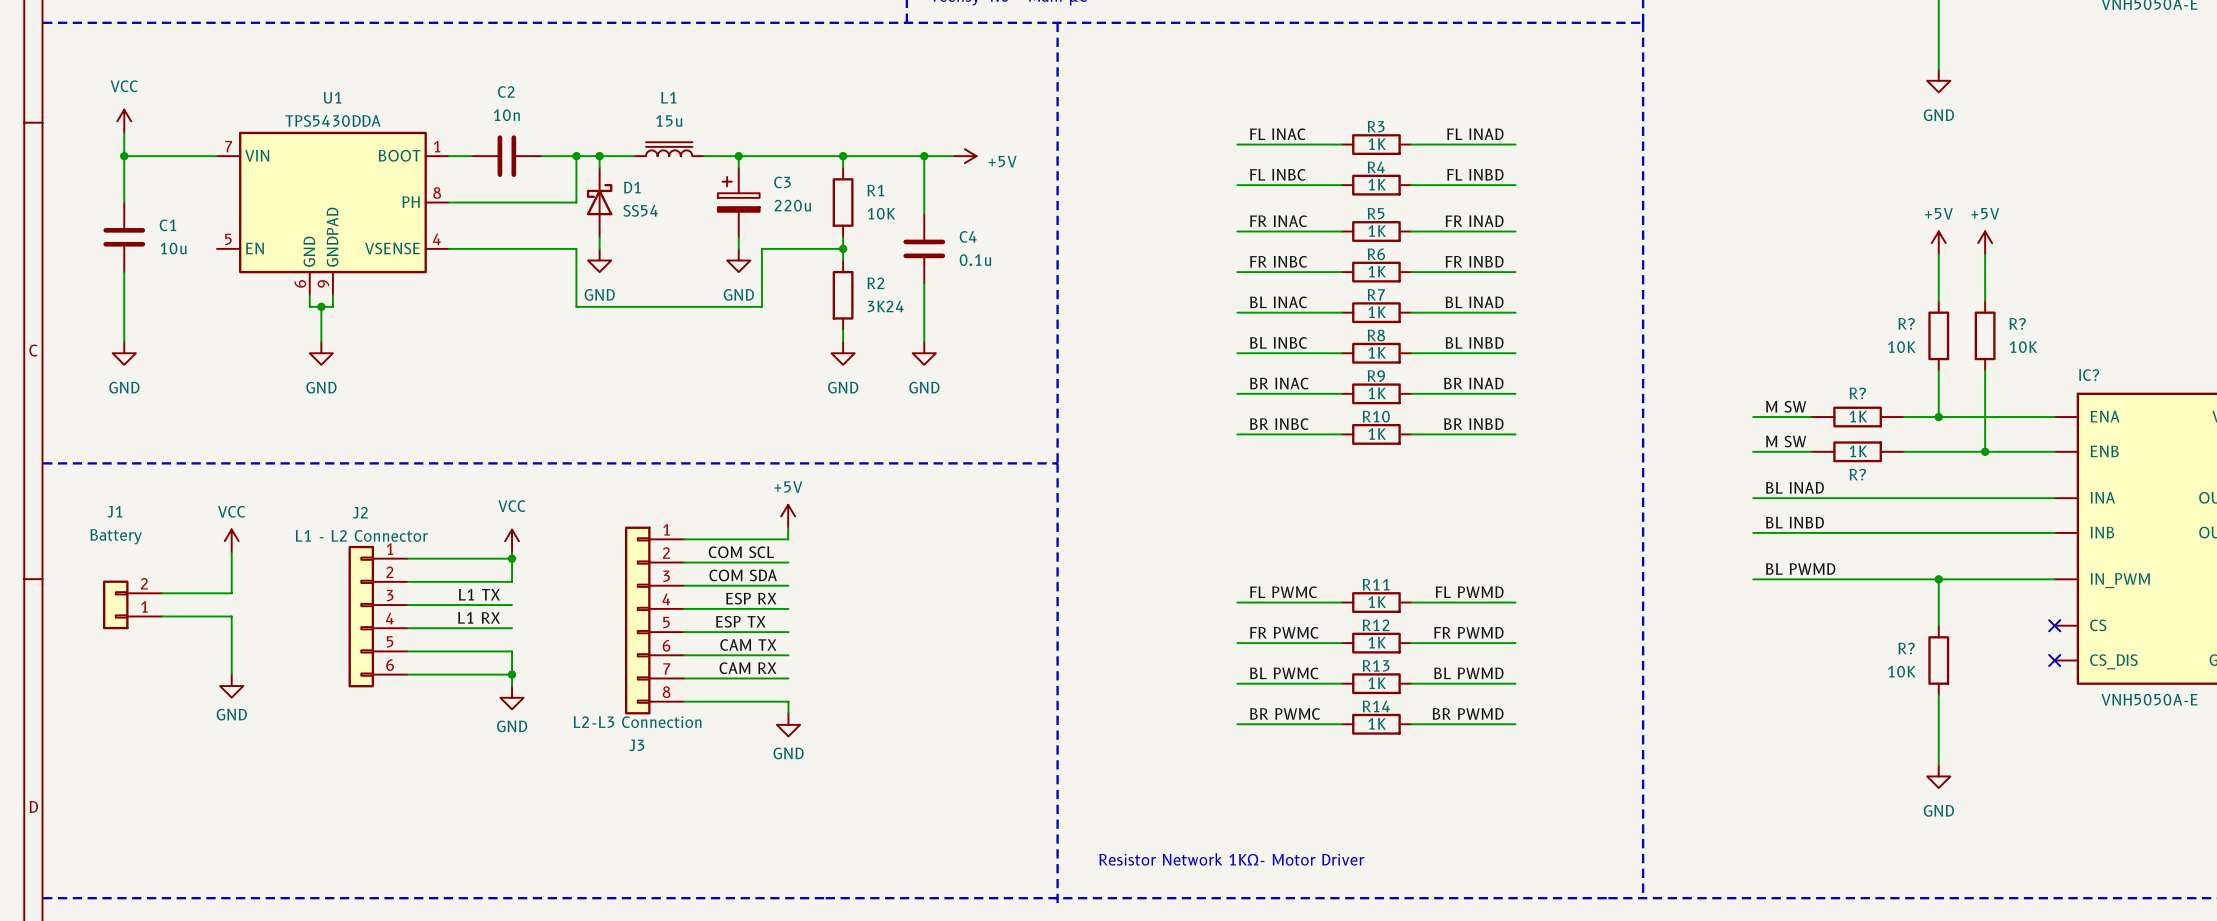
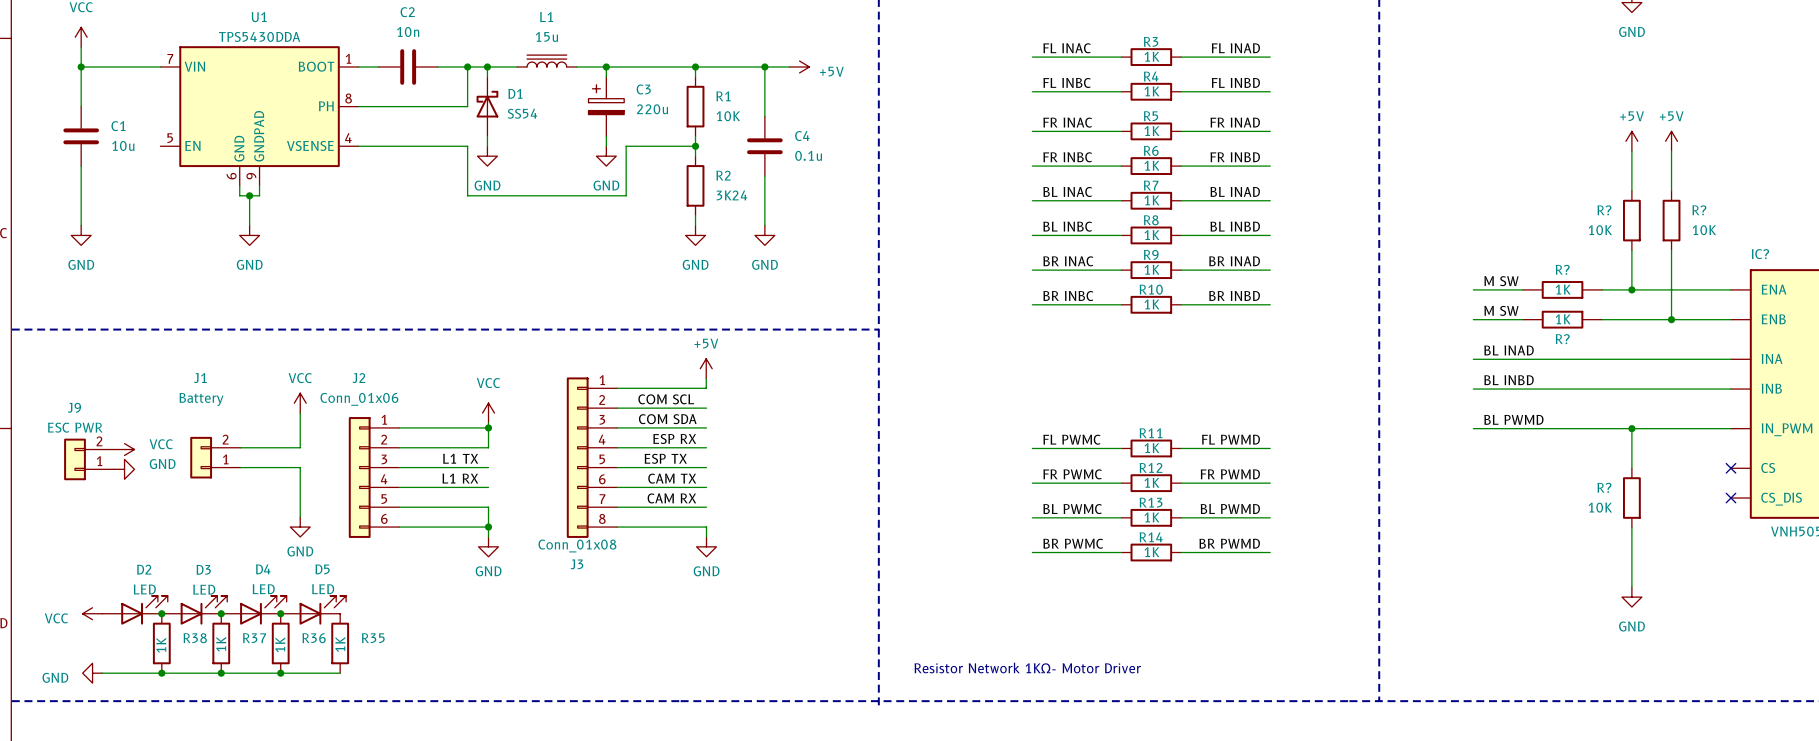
J2 name position: J2 (360, 512) -> J2 (358, 378)
power symbol position: +5V (788, 516) -> +5V (706, 368)
wire: (788, 528) (788, 539) (684, 539) -> (706, 378) (706, 388) (617, 388)
J2 value: L1 - L2 Connector (361, 535) -> Conn_01x06 (359, 399)
power symbol: VCC (231, 541) -> none
power symbol: VCC (512, 541) -> none
power symbol: none -> VCC (300, 403)
wire: (231, 552) (231, 593) (162, 593) -> (300, 413) (300, 447) (240, 447)
wire: (512, 552) (512, 581) (407, 581) -> (488, 422) (488, 447) (399, 447)
label position: COM SCL (741, 552) -> COM SCL (666, 399)
wire: (407, 558) (512, 558) -> (399, 427) (488, 427)
junction: (512, 558) -> none
power symbol: none -> VCC (488, 413)
wire: (684, 562) (788, 562) -> (617, 408) (706, 408)
label position: COM SDA (743, 575) -> COM SDA (667, 419)
junction: none -> (488, 427)
wire: (684, 585) (788, 585) -> (617, 427) (706, 427)
label position: L1 TX (479, 594) -> L1 TX (460, 458)
label position: ESP RX (751, 598) -> ESP RX (674, 438)
power symbol: none -> VCC (124, 449)
J1 position: (132, 604) -> (215, 457)
wire: (407, 605) (512, 605) -> (399, 467) (488, 467)
wire: (684, 608) (788, 608) -> (617, 447) (706, 447)
J9: none -> ESC PWR (89, 459)
wire: (162, 616) (231, 616) (231, 674) -> (240, 467) (300, 467) (300, 517)
J2 position: (378, 616) -> (374, 477)
label position: L1 RX (479, 617) -> L1 RX (460, 478)
J3 position: (654, 620) -> (592, 457)
label position: ESP TX (740, 621) -> ESP TX (665, 458)
power symbol: none -> GND (124, 469)
wire: (407, 628) (512, 628) -> (399, 487) (488, 487)
wire: (684, 632) (788, 632) -> (617, 467) (706, 467)
label position: CAM TX (748, 645) -> CAM TX (672, 478)
wire: (407, 651) (512, 651) (512, 686) -> (399, 507) (488, 507) (488, 536)
wire: (684, 655) (788, 655) -> (617, 487) (706, 487)
label position: CAM RX (747, 668) -> CAM RX (671, 498)
wire: (407, 674) (512, 674) -> (399, 527) (488, 527)
junction: (512, 674) -> none
wire: (684, 678) (788, 678) -> (617, 507) (706, 507)
power symbol: GND (231, 686) -> none
power symbol: none -> GND (300, 527)
junction: none -> (488, 527)
power symbol: GND (512, 697) -> none
wire: (684, 701) (788, 701) (788, 713) -> (617, 527) (706, 527) (706, 536)
power symbol: none -> GND (488, 546)
J3 value: L2-L3 Connection (637, 722) -> Conn_01x08 (577, 545)
power symbol position: GND (788, 724) -> GND (706, 546)
D2: none -> LED (135, 610)
D3: none -> LED (194, 610)
D4: none -> LED (253, 610)
D5: none -> LED (313, 610)
power symbol: none -> VCC (92, 613)
junction: none -> (161, 613)
junction: none -> (221, 613)
junction: none -> (280, 613)
R38: none -> 1K (161, 643)
R37: none -> 1K (221, 643)
R36: none -> 1K (280, 643)
R35: none -> 1K (340, 643)
power symbol: none -> GND (92, 673)
wire: none -> (102, 673) (340, 673)
junction: none -> (161, 673)
junction: none -> (221, 673)
junction: none -> (280, 673)

